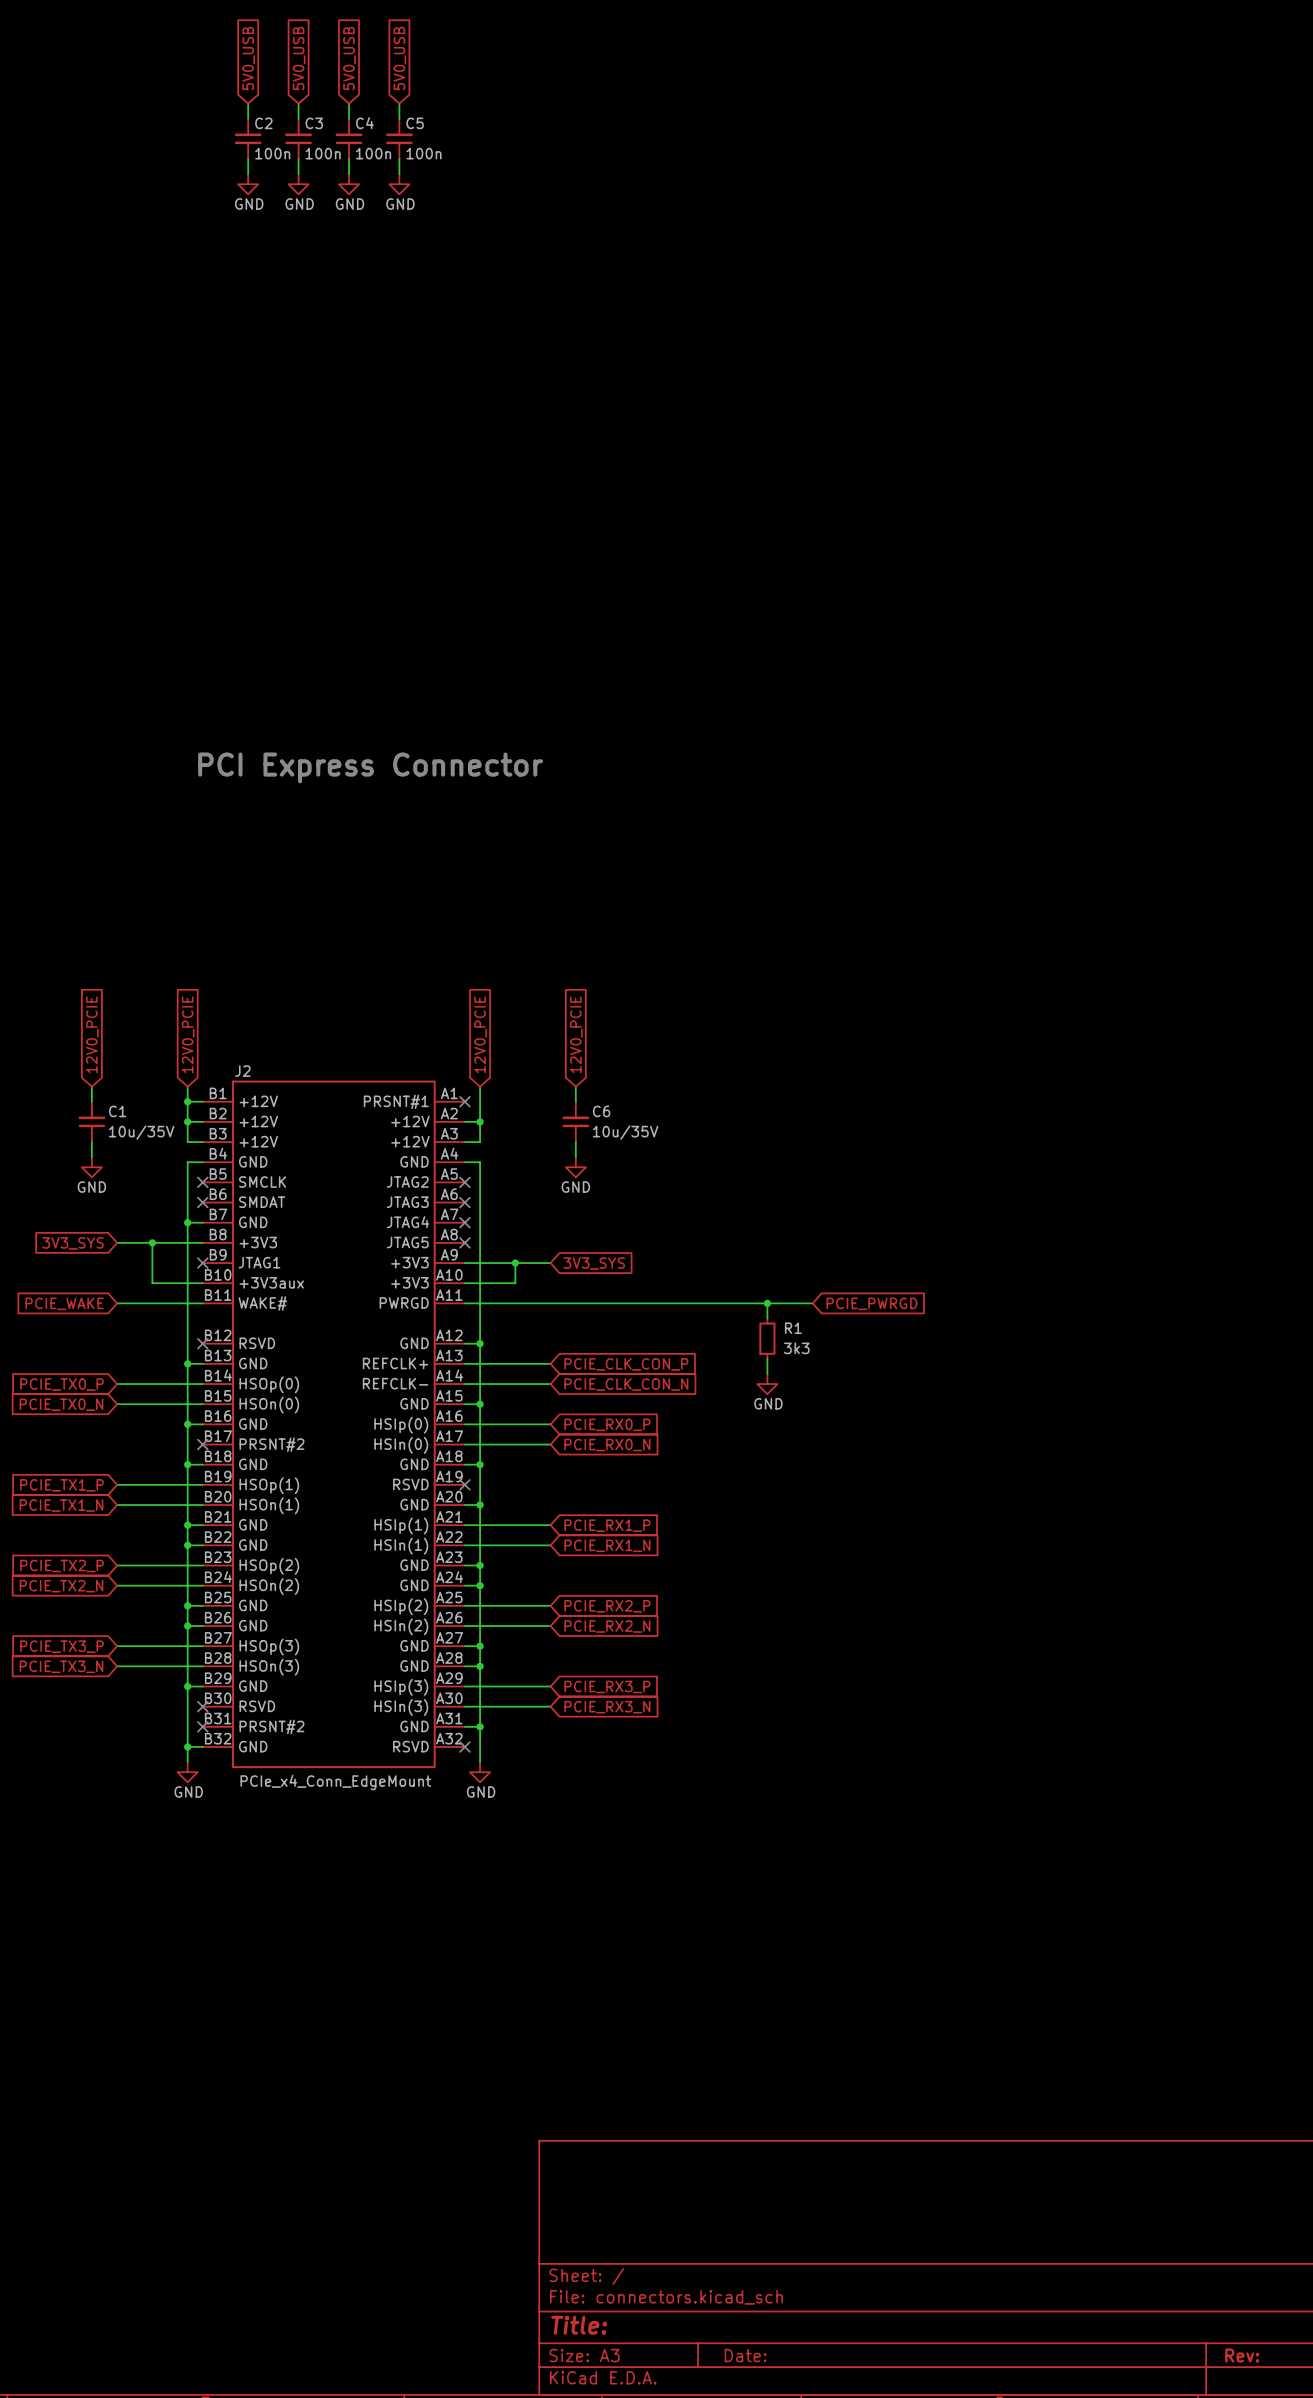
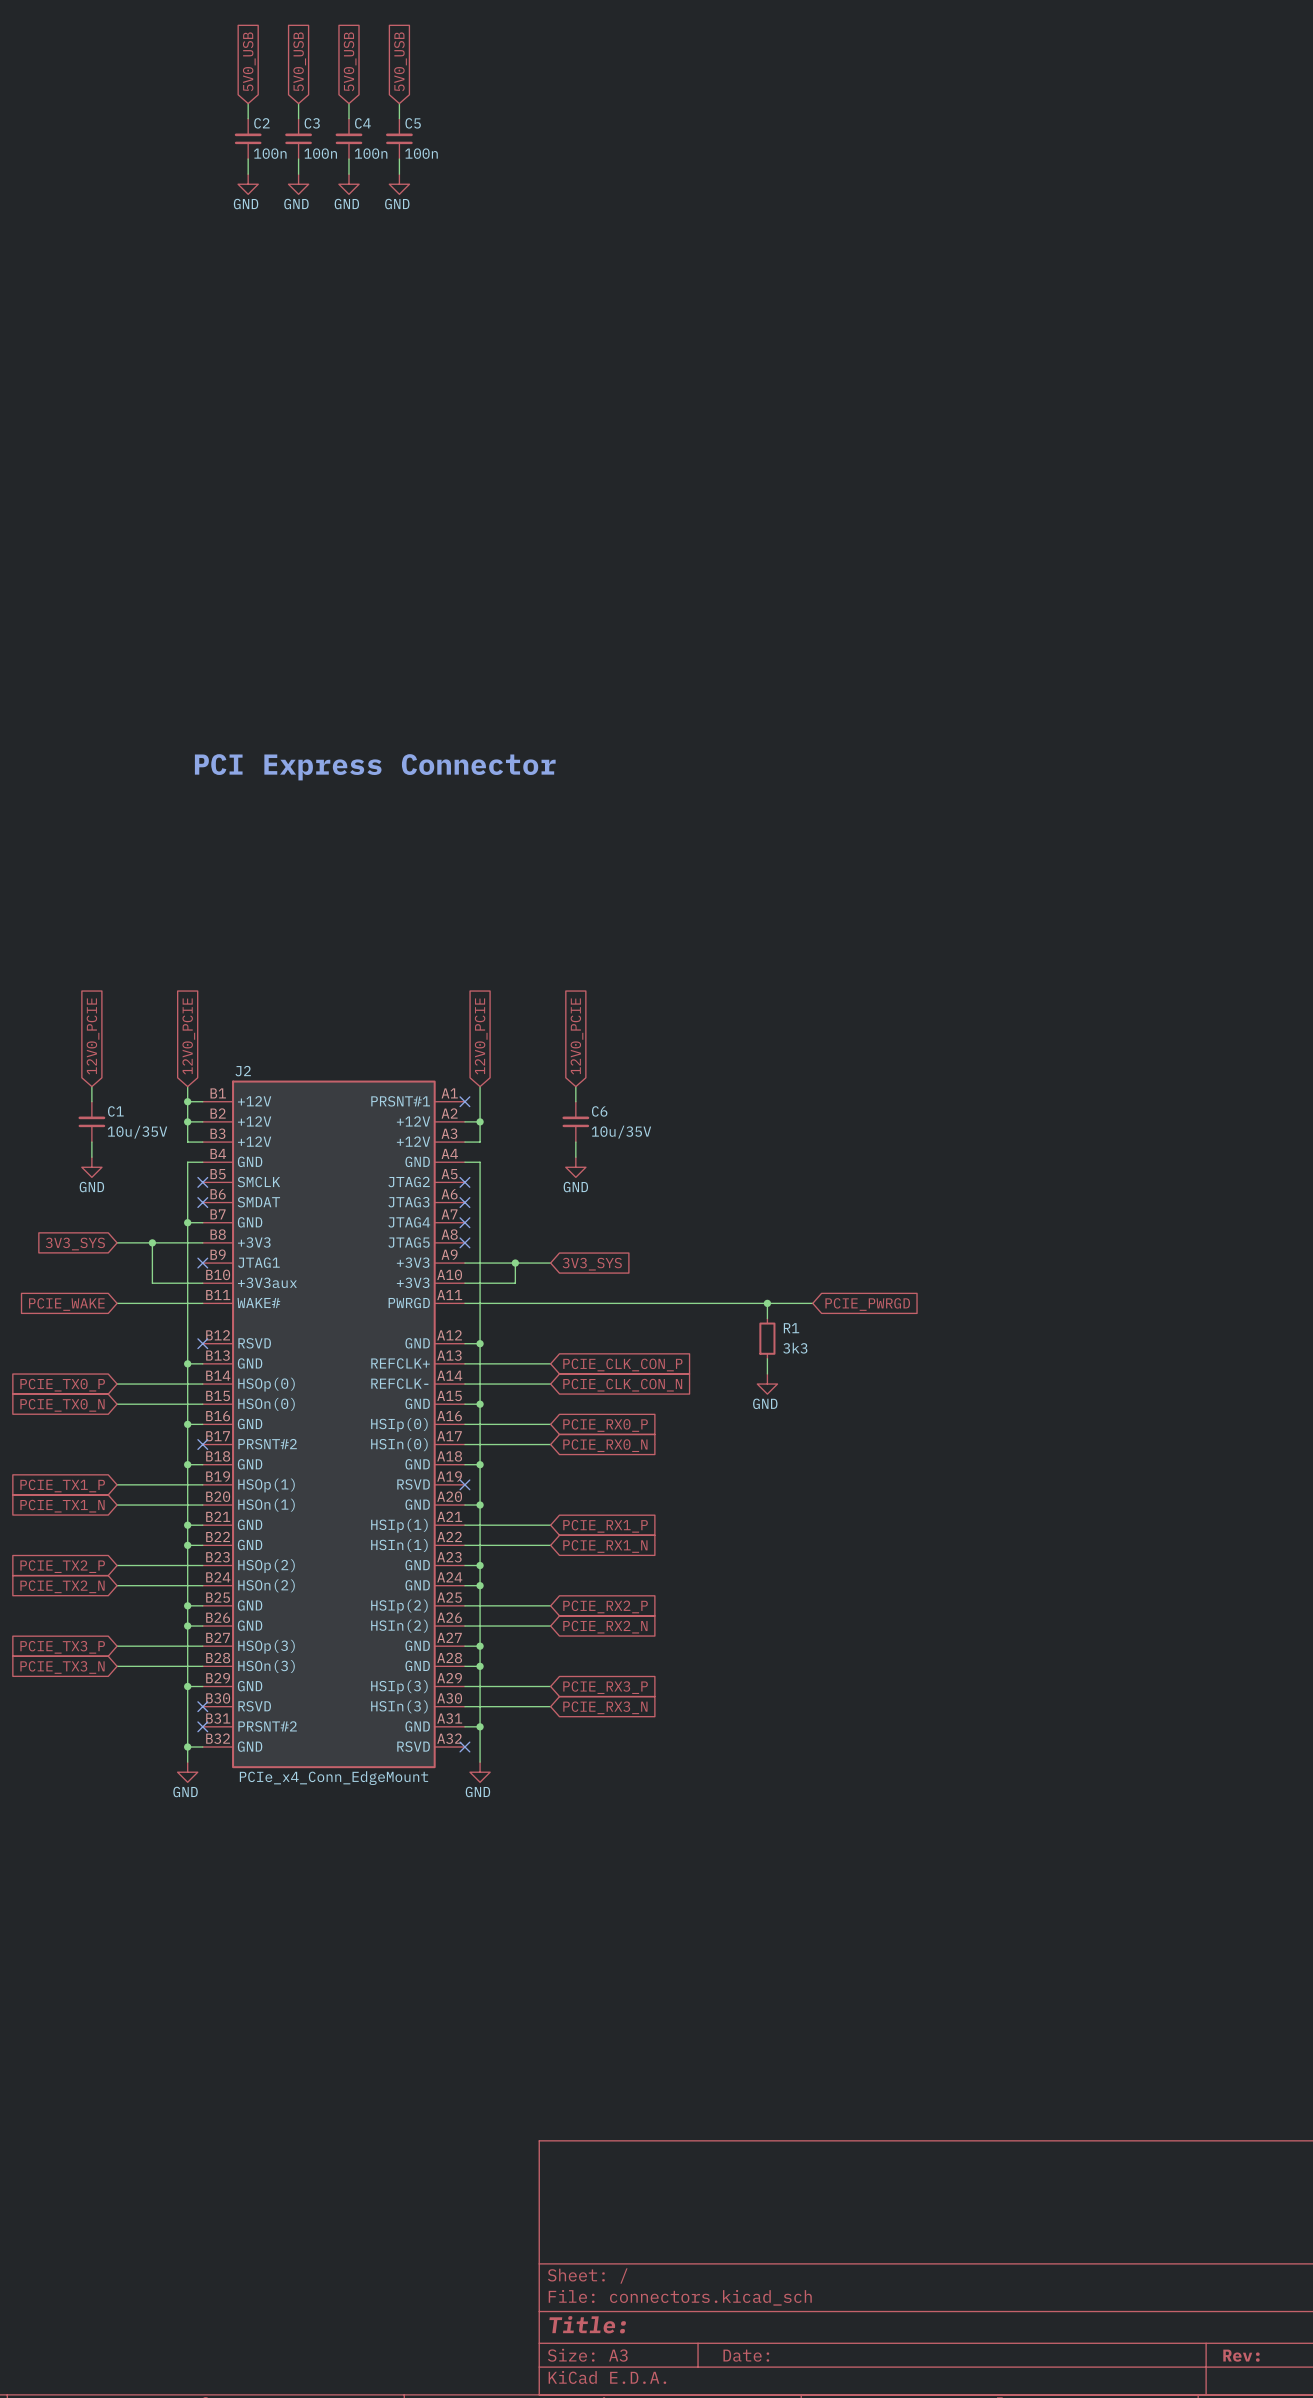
J2 value position: PCIe_x4_Conn_EdgeMount (335, 1782) -> PCIe_x4_Conn_EdgeMount (333, 1778)

